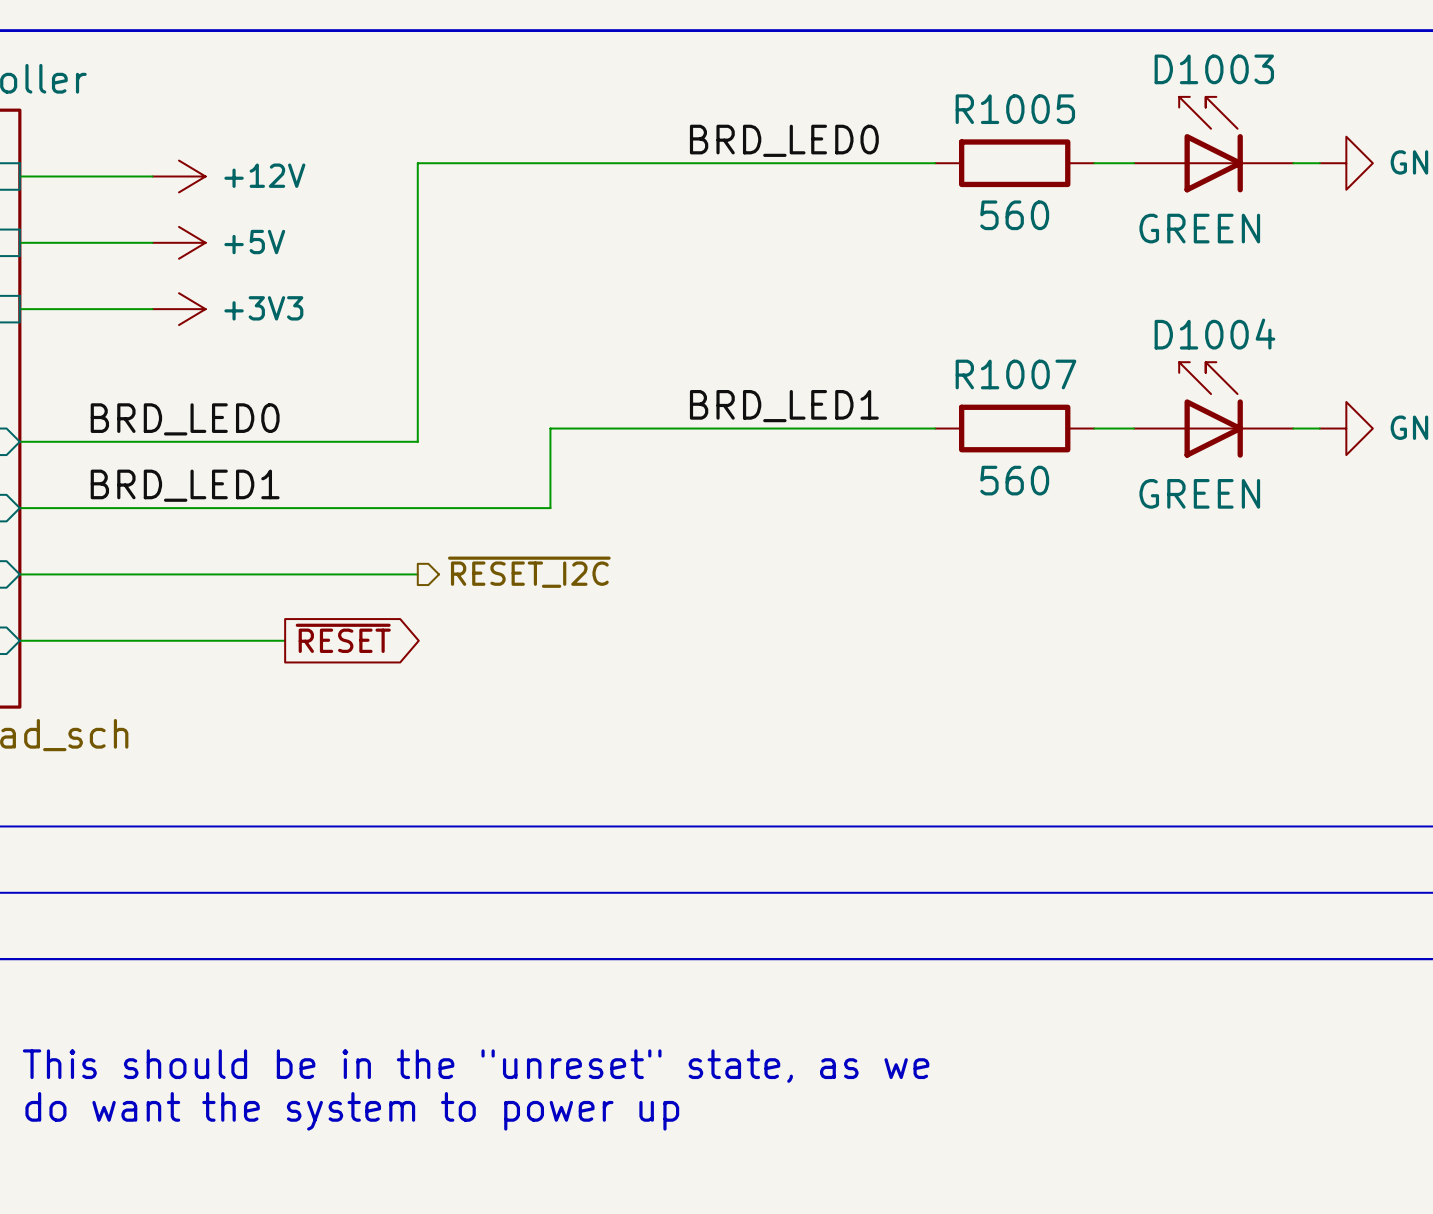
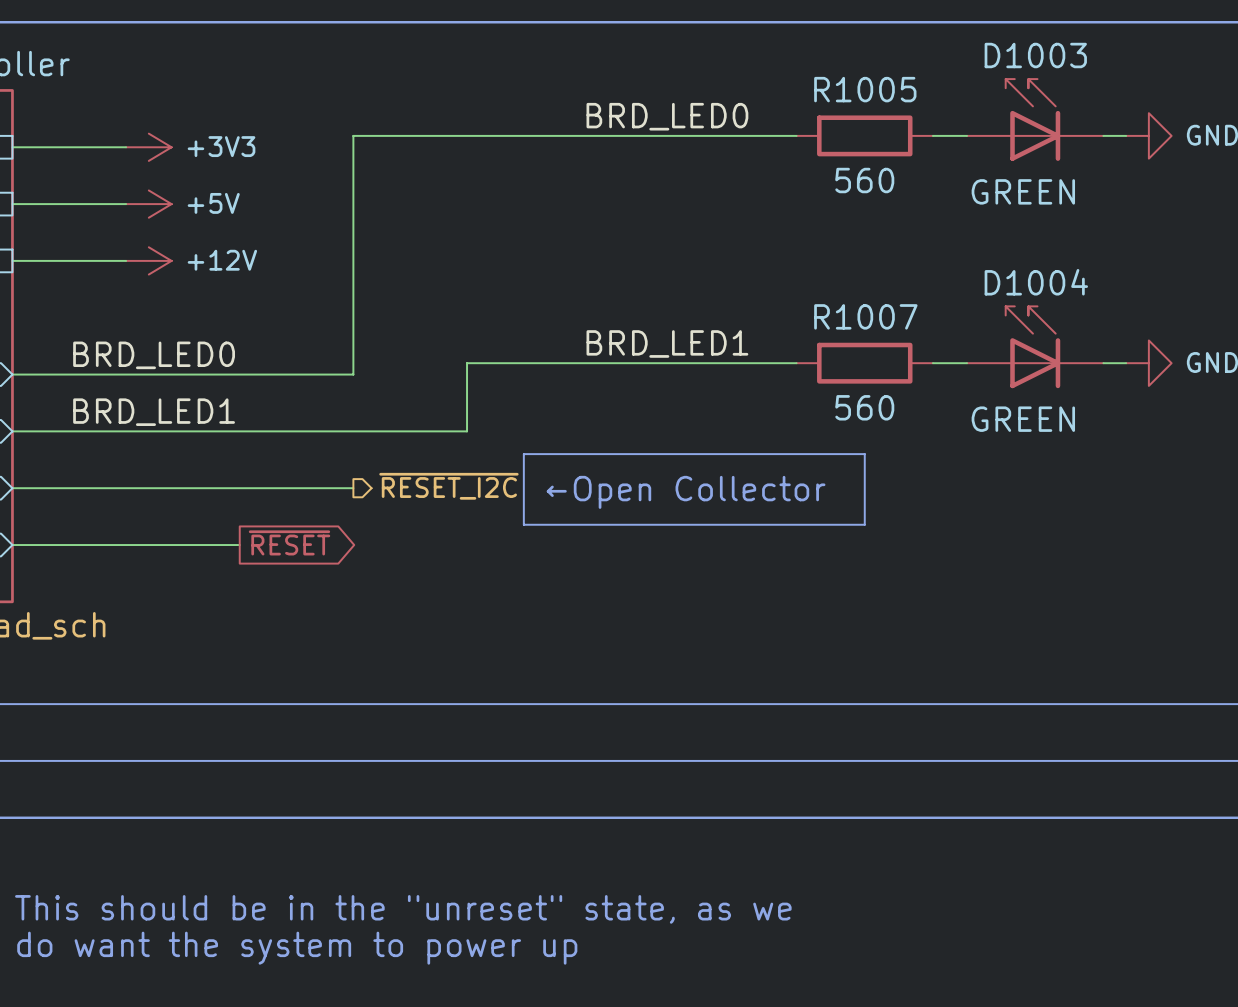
power symbol: +12V (179, 176) -> +3V3 (148, 147)
power symbol: +3V3 (179, 309) -> +12V (148, 260)
line: none -> (523, 454) (864, 454) (864, 524) (523, 524) (523, 454)
text: none -> ←Open Collector (686, 492)

